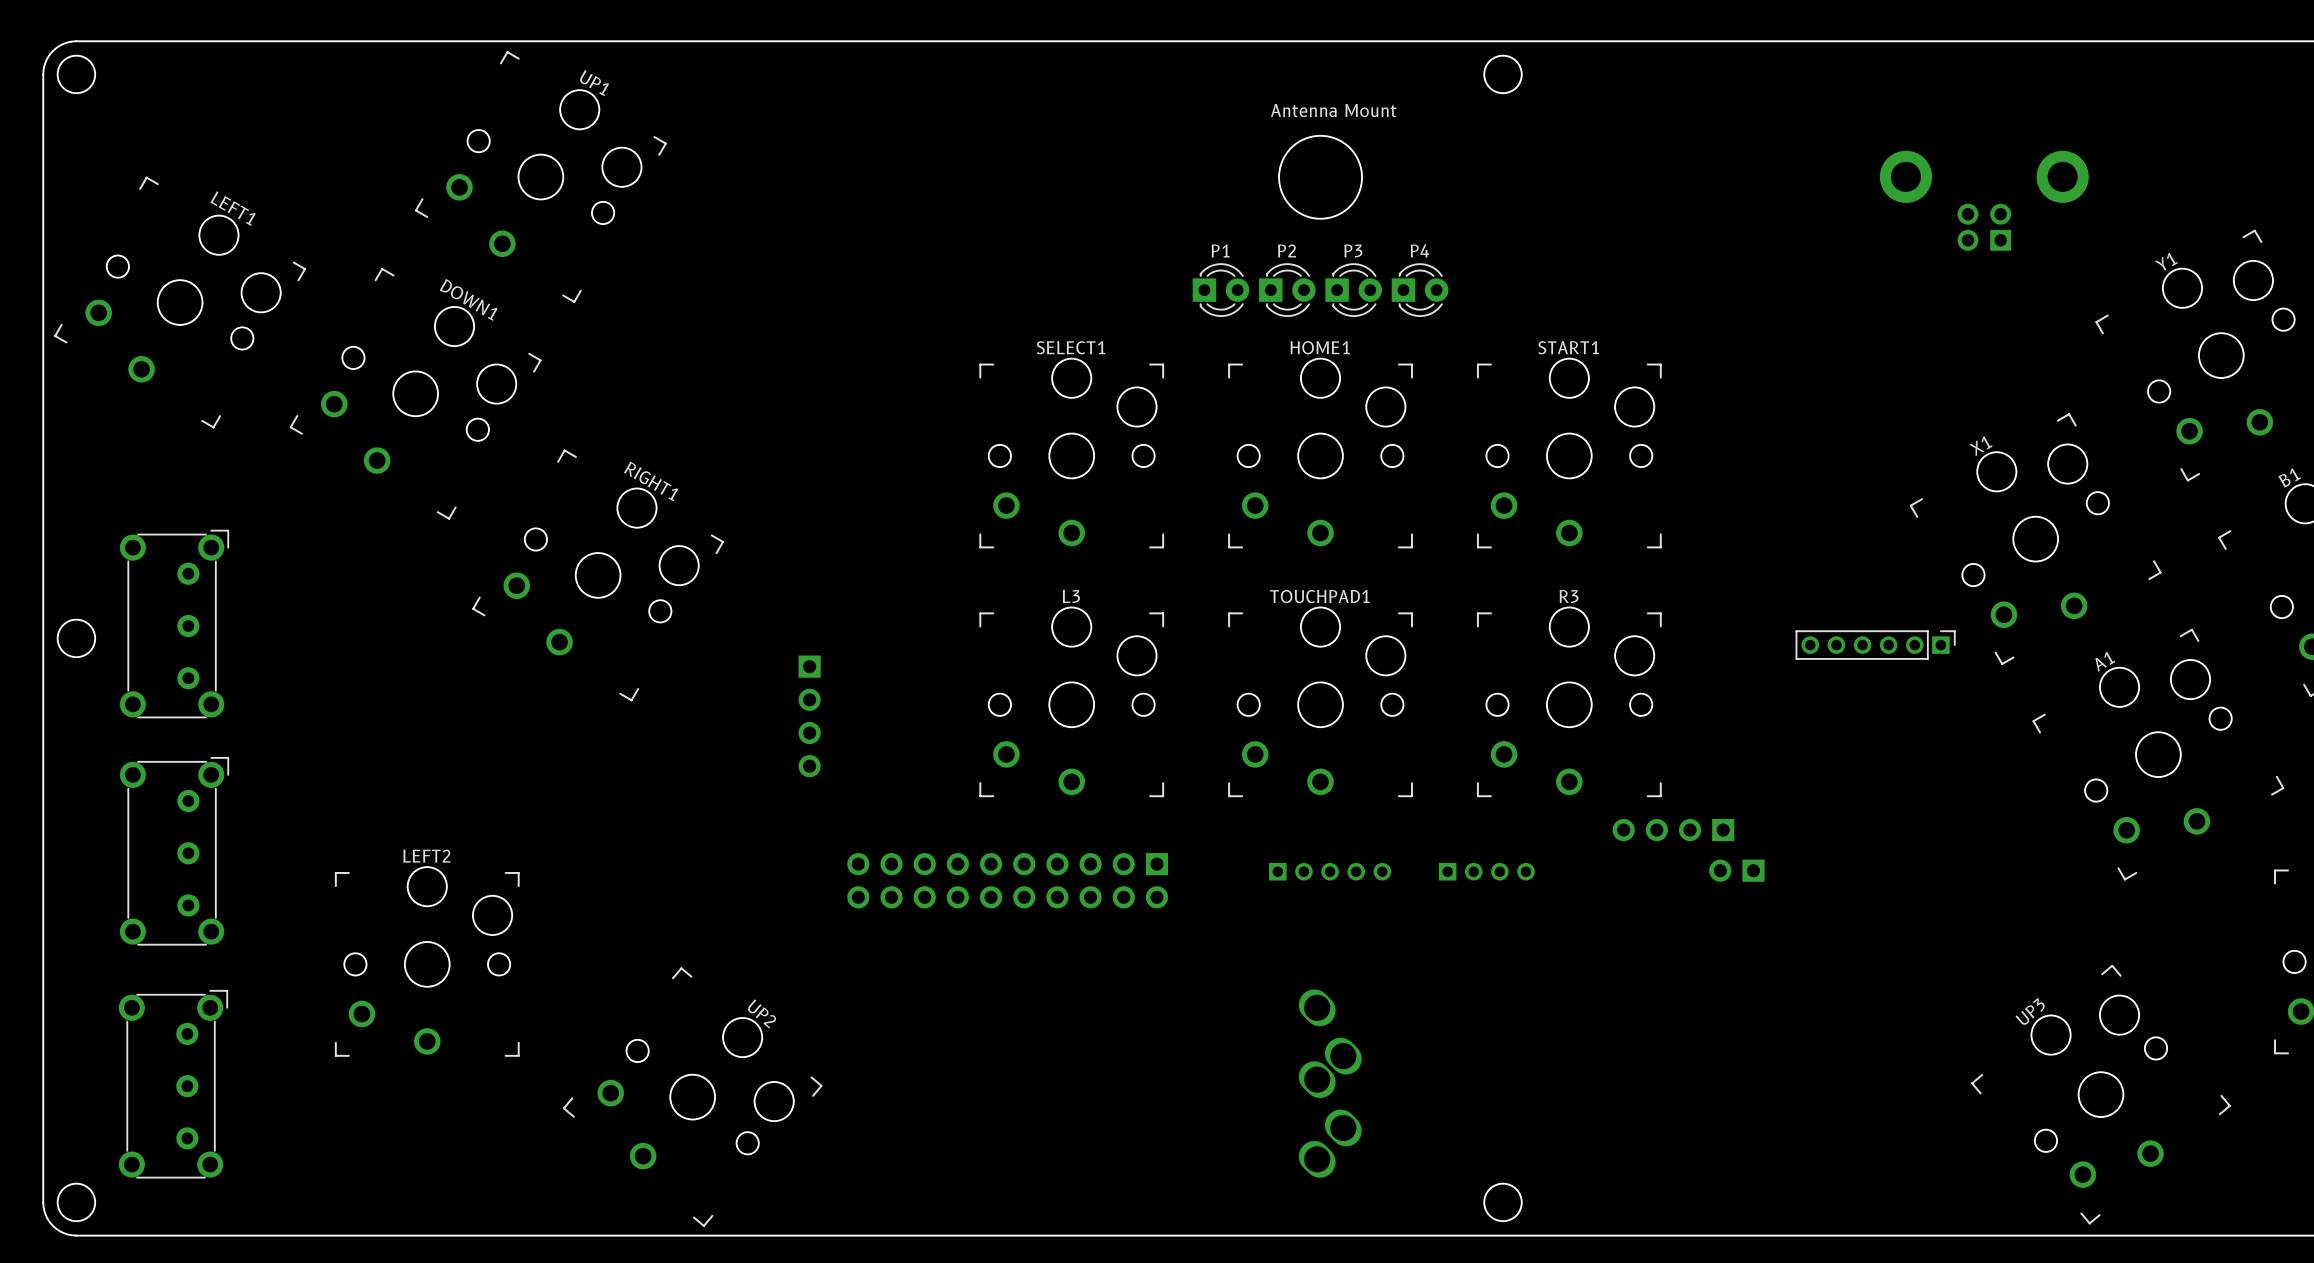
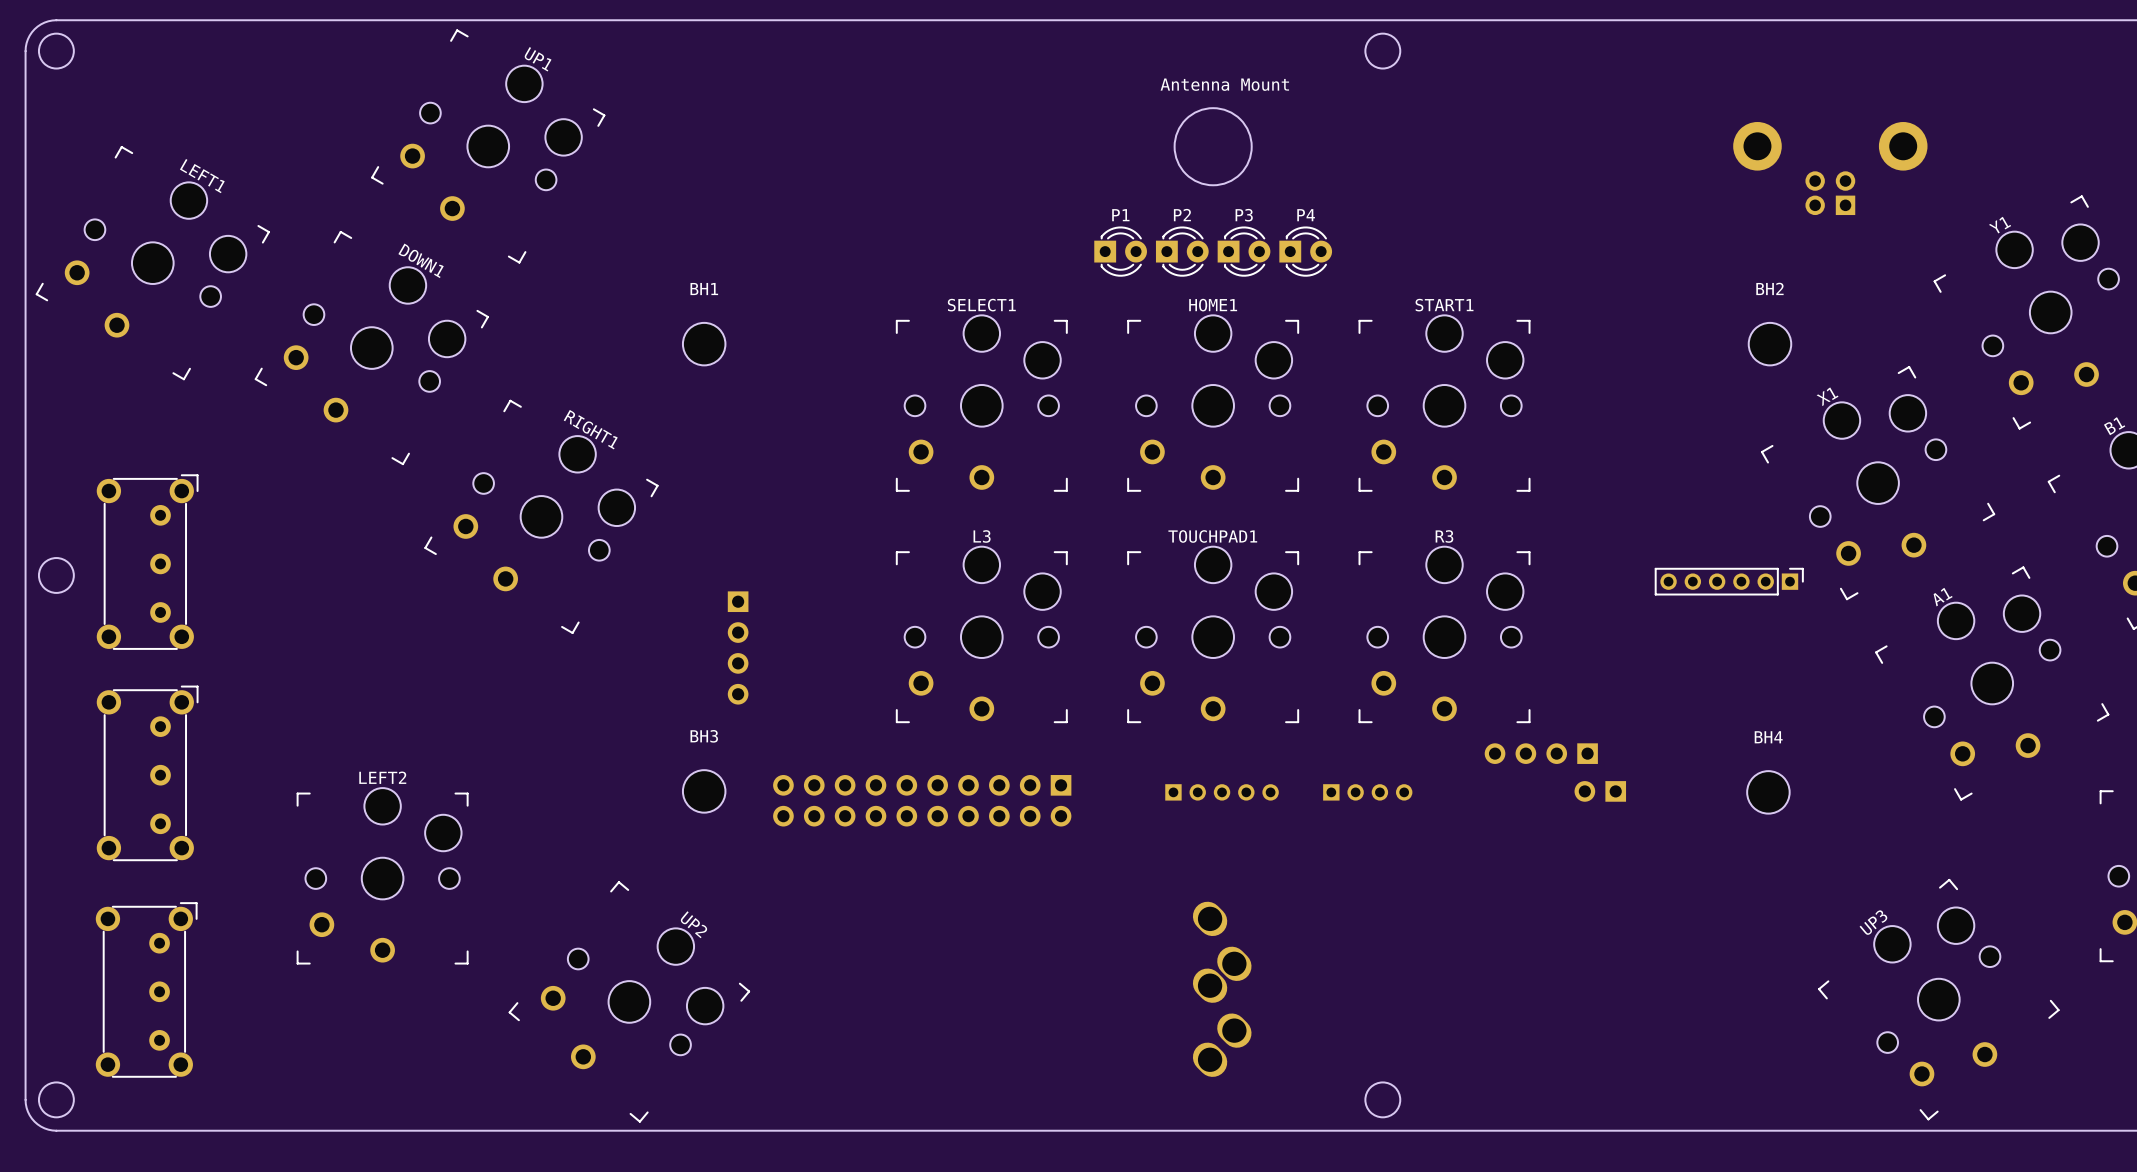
BH1: none -> (704, 344)
BH2: none -> (1769, 344)
BH3: none -> (704, 791)
BH4: none -> (1768, 792)

